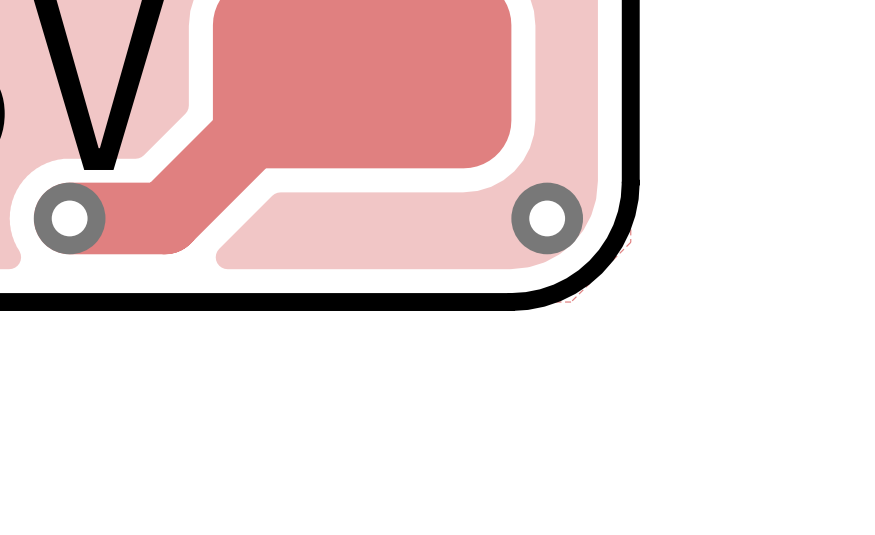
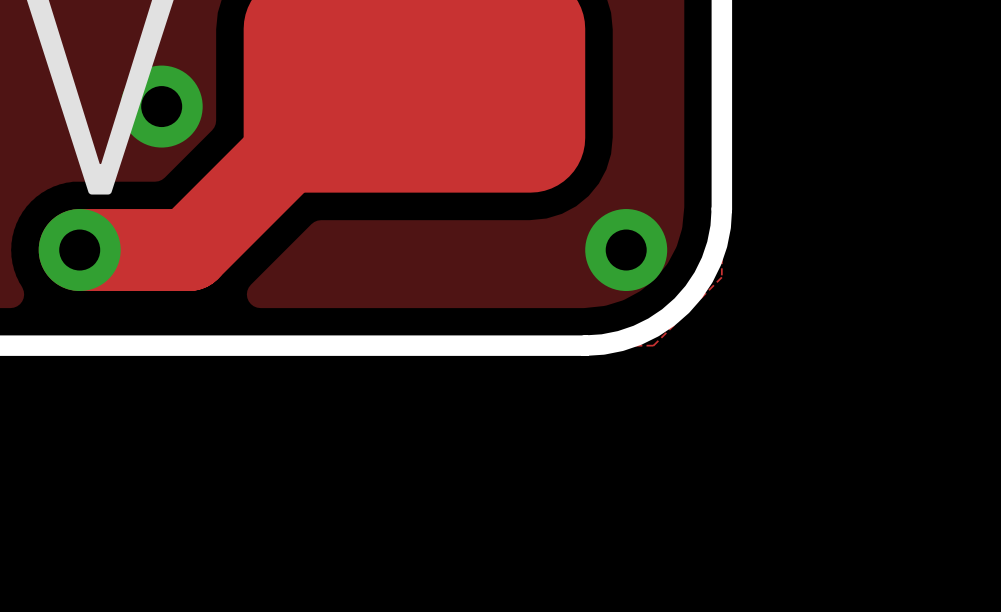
via: none -> (161, 106)

